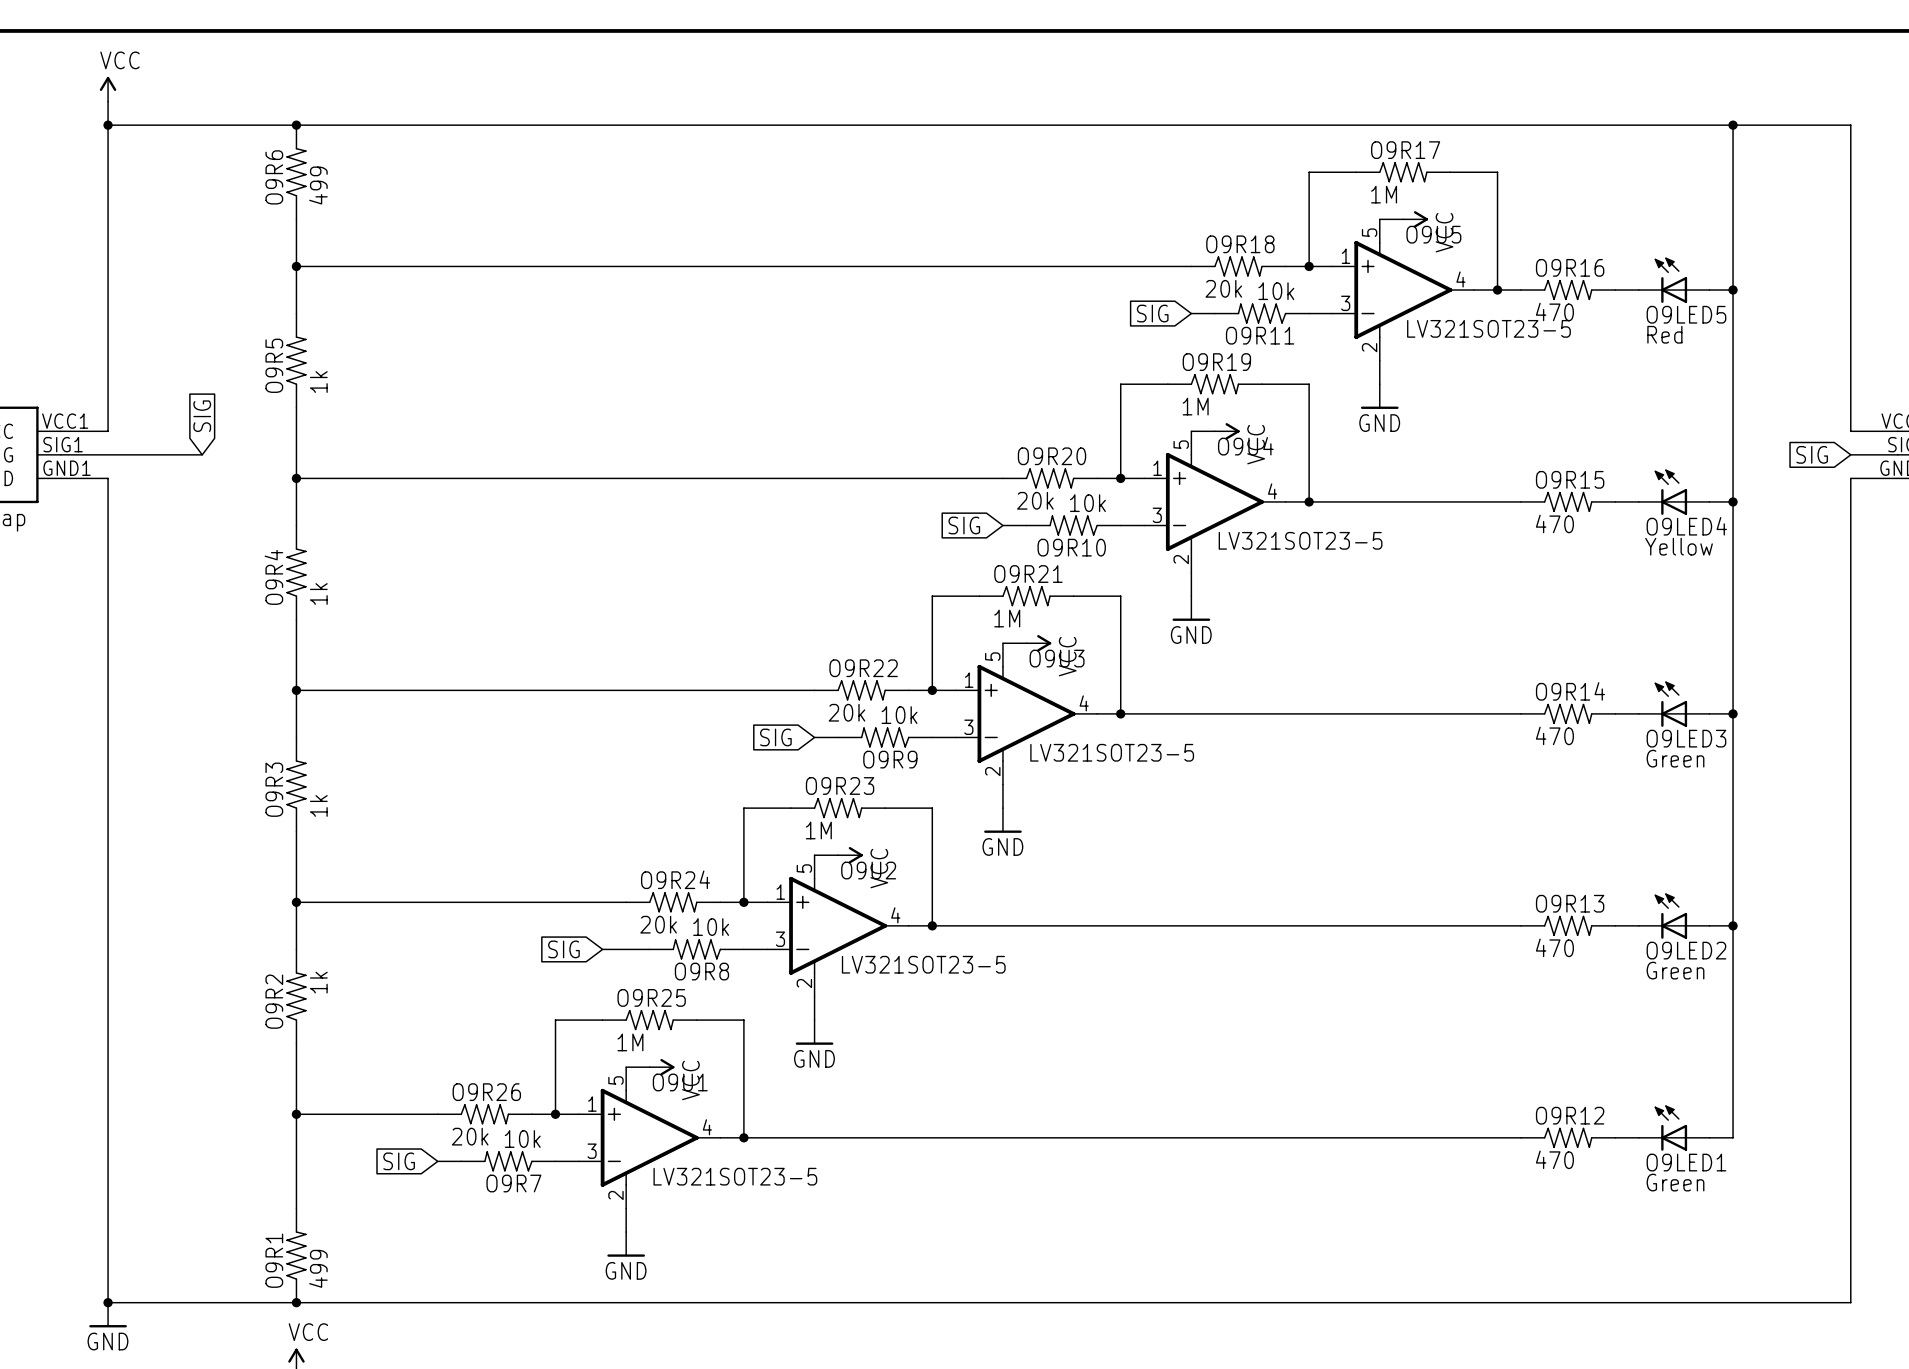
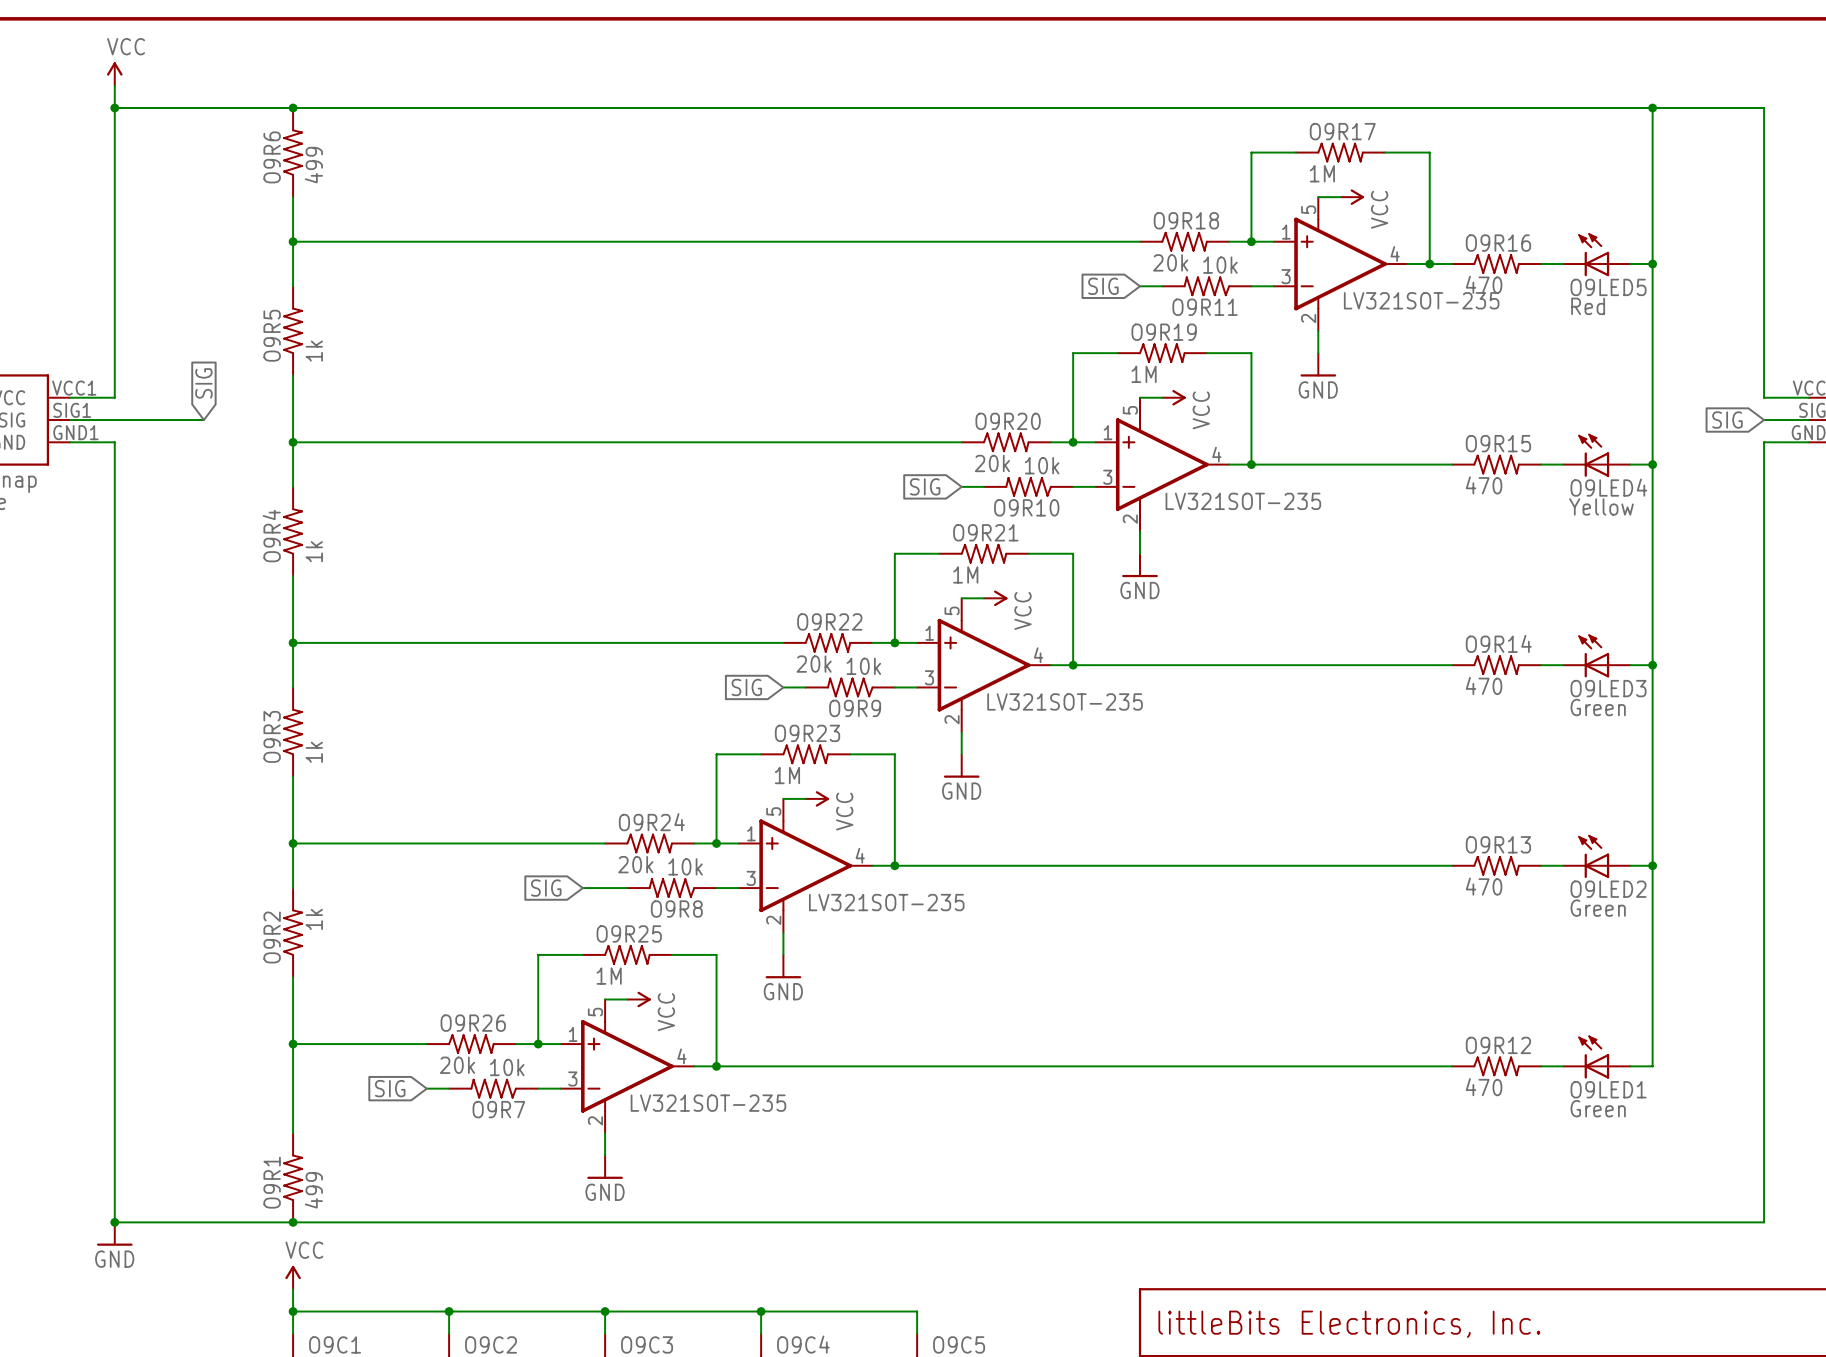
O9U5 name: O9U5 (1433, 234) -> none
O9U5 value: LV321SOT23-5 (1488, 328) -> LV321SOT-235 (1421, 300)
O9U4 name: O9U4 (1245, 446) -> none
O9U4 value: LV321SOT23-5 (1300, 540) -> LV321SOT-235 (1243, 501)
O9U3 name: O9U3 (1057, 658) -> none
O9U3 value: LV321SOT23-5 (1112, 752) -> LV321SOT-235 (1065, 701)
O9U2 name: O9U2 (868, 870) -> none
O9U2 value: LV321SOT23-5 (923, 964) -> LV321SOT-235 (886, 902)
O9U1 name: O9U1 (680, 1082) -> none
O9U1 value: LV321SOT23-5 (735, 1176) -> LV321SOT-235 (708, 1103)

